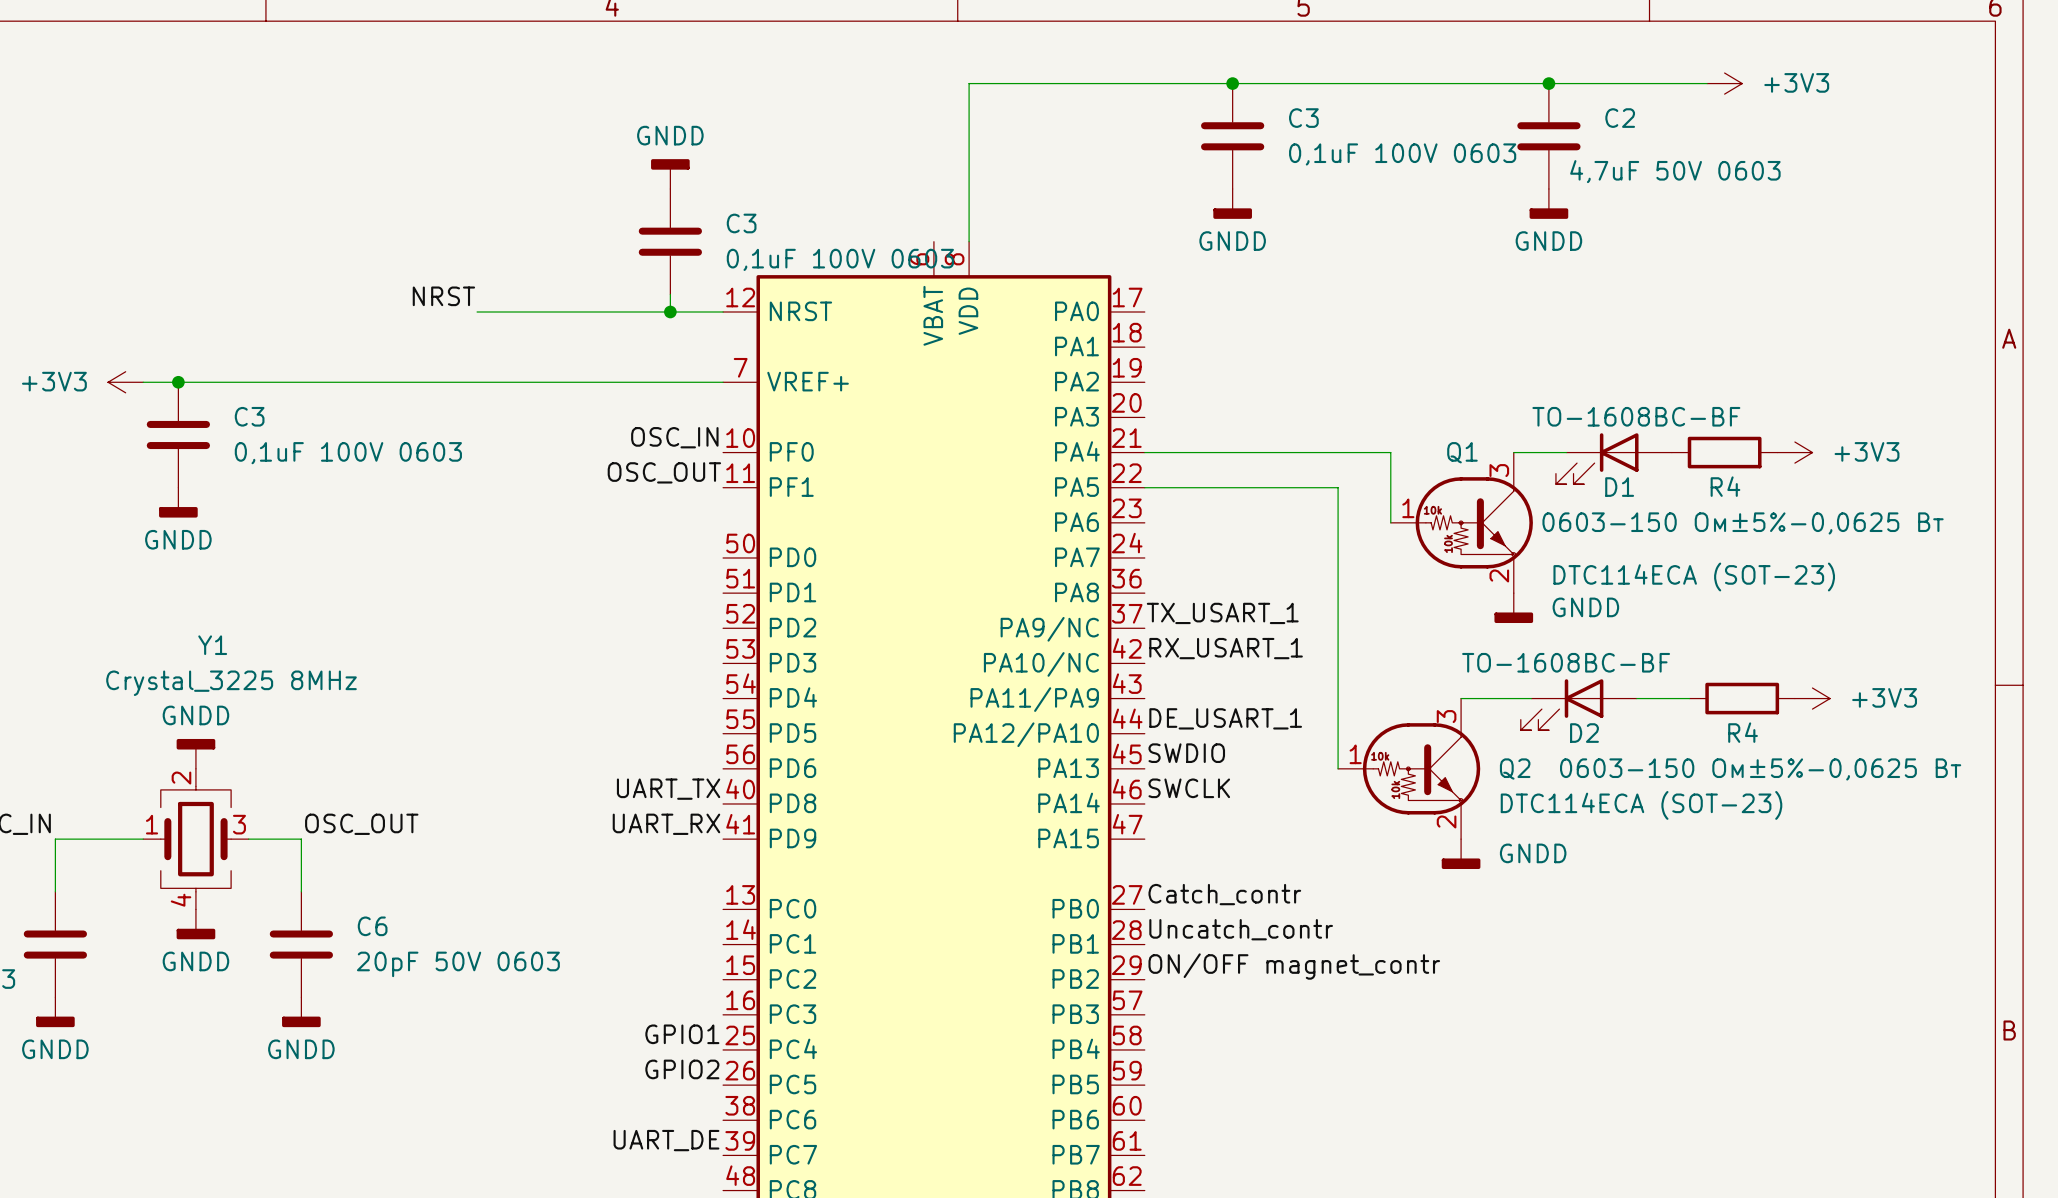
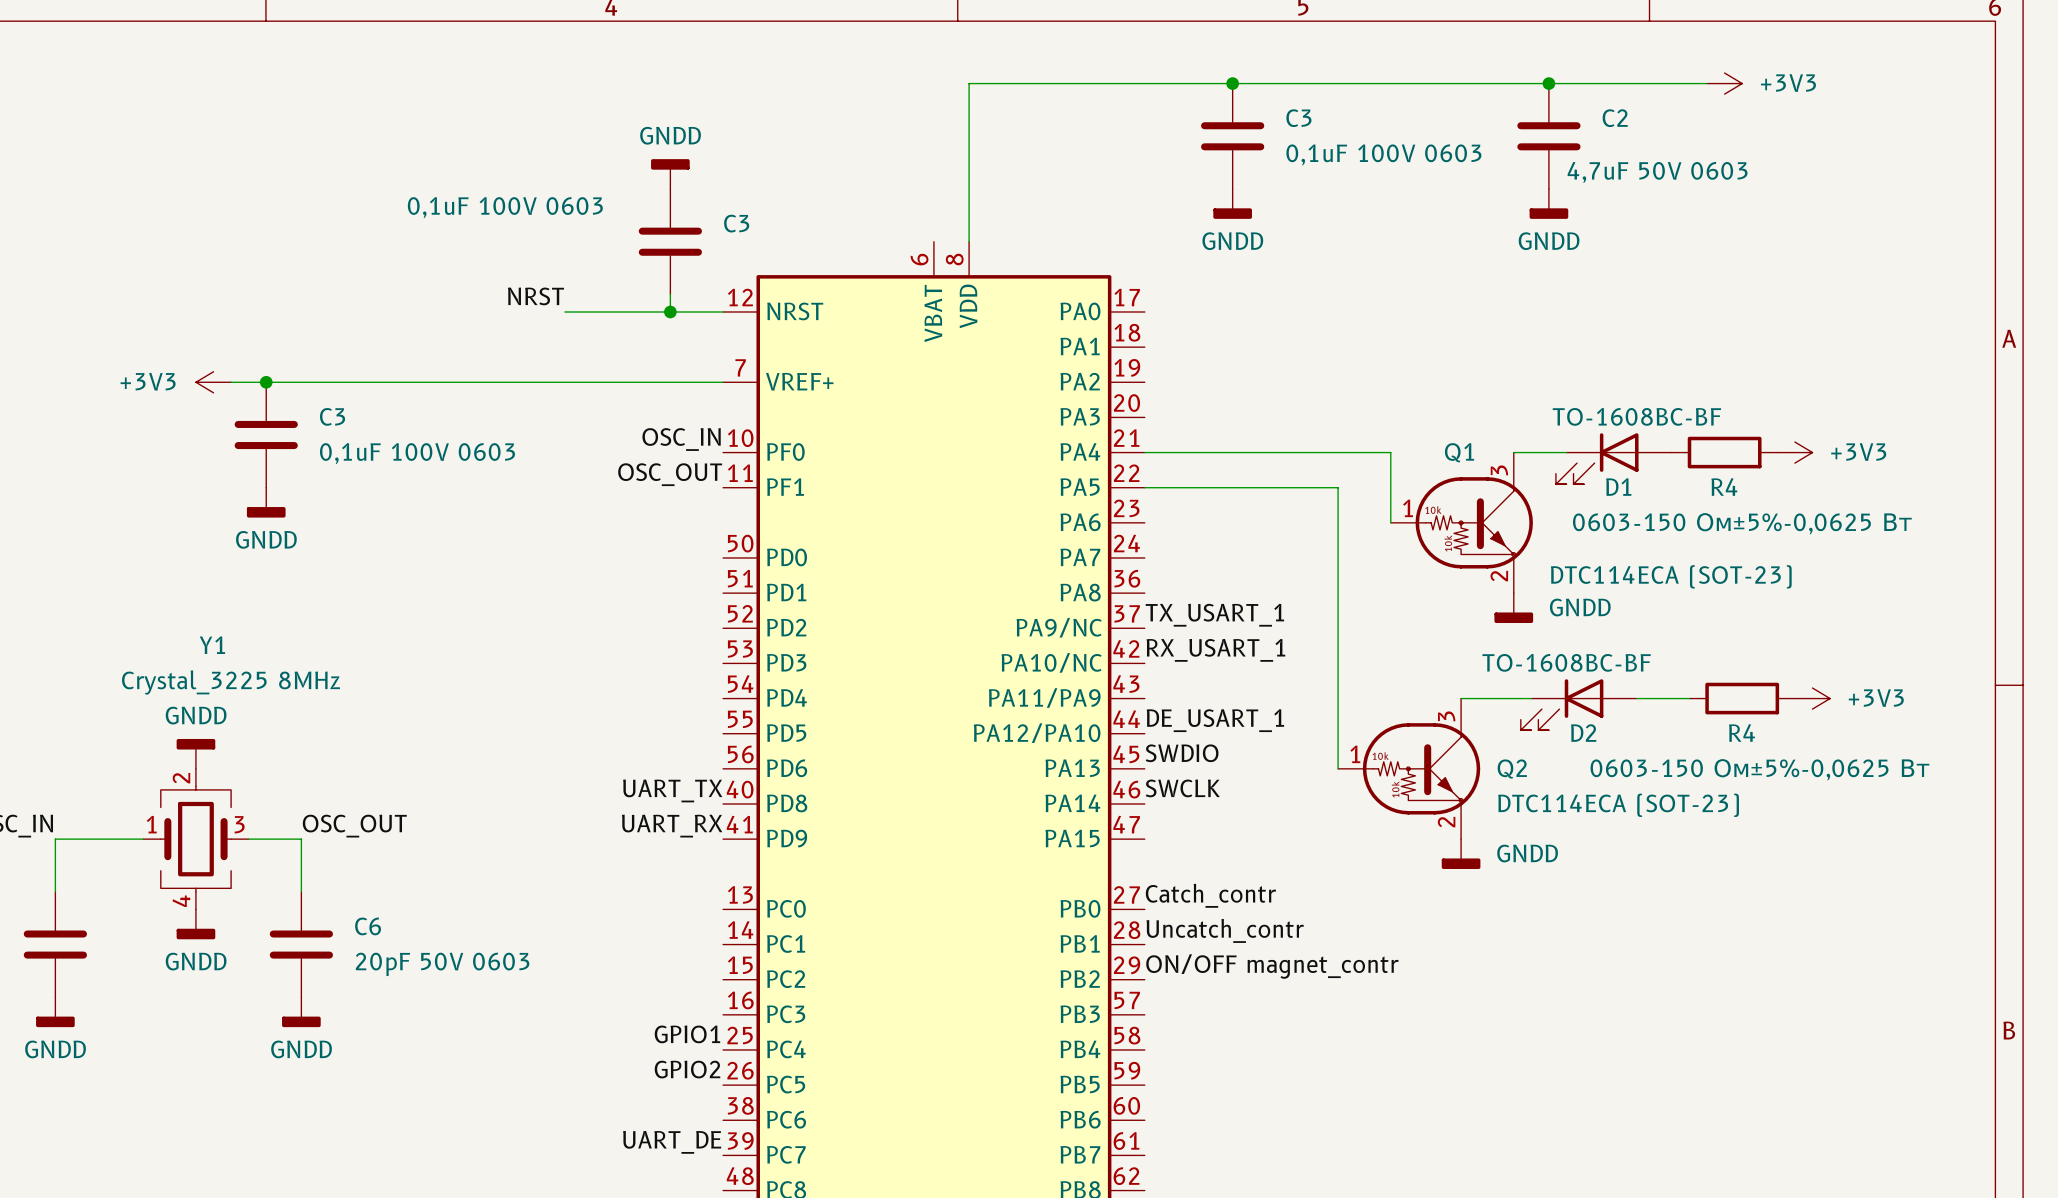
C3 value position: 0,1uF 100V 0603 (840, 259) -> 0,1uF 100V 0603 (505, 207)
label position: NRST (443, 296) -> NRST (535, 296)
wire: (477, 311) (564, 311) -> none
power symbol position: +3V3 (125, 382) -> +3V3 (213, 382)
wire: (143, 382) (231, 382) -> none
junction: (178, 382) -> none
junction: none -> (266, 382)
C3 position: (178, 434) -> (266, 434)
power symbol position: GNDD (178, 502) -> GNDD (266, 502)

